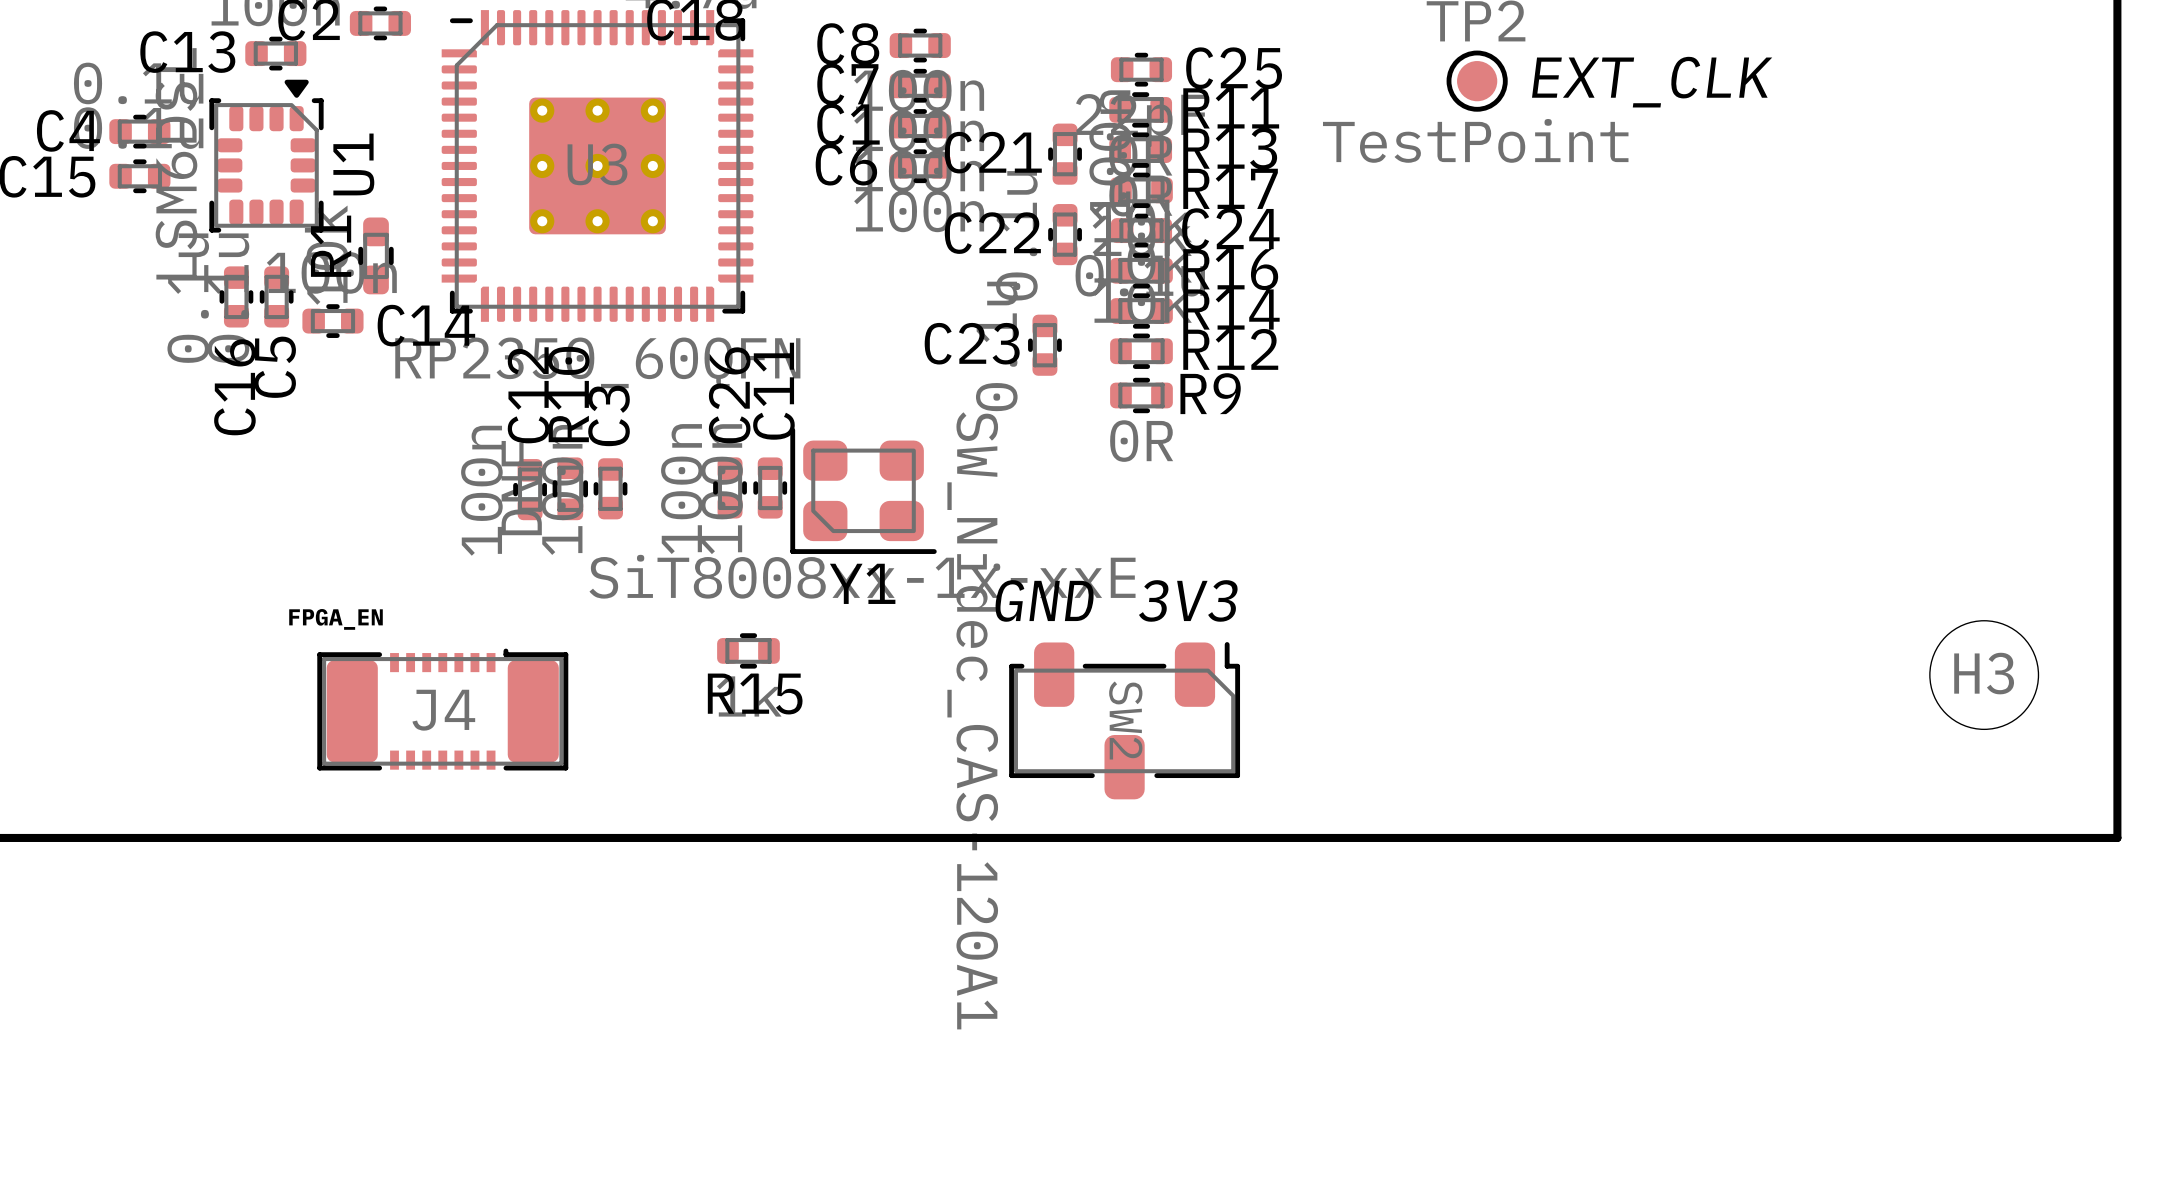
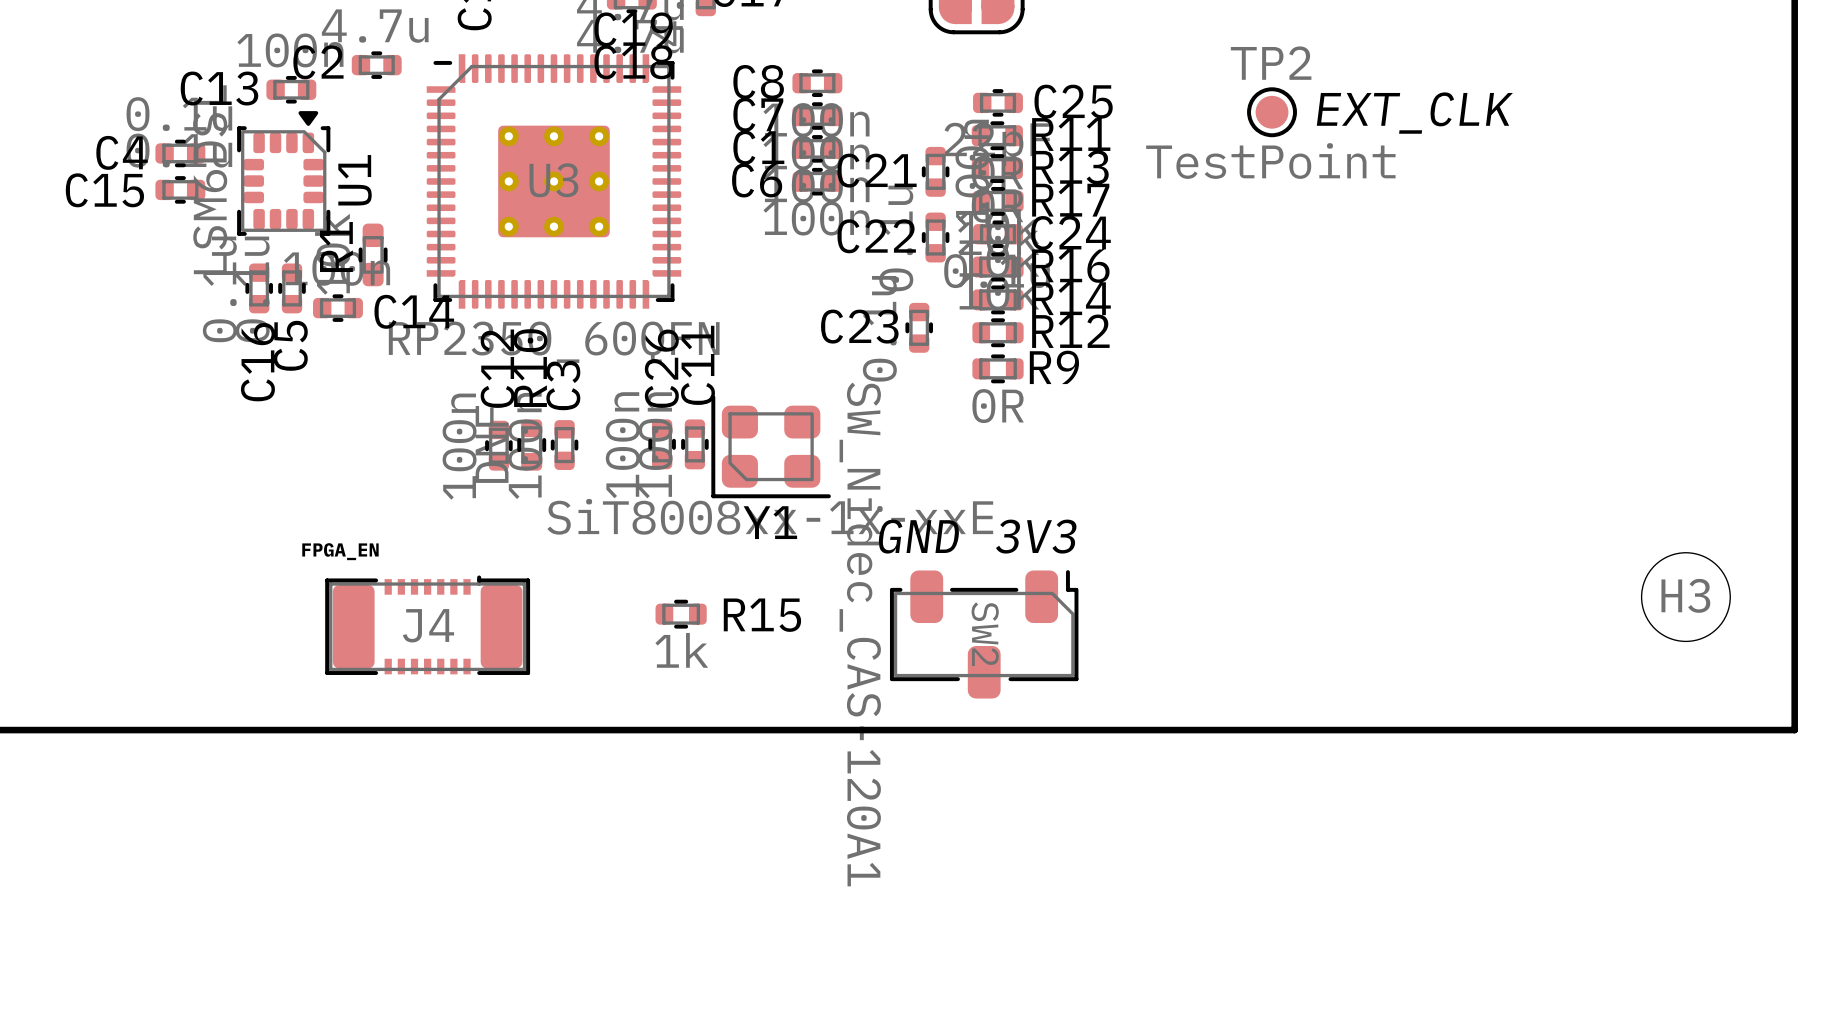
R15 position: (748, 650) -> (681, 614)
R15 name position: R15 (755, 694) -> R15 (762, 615)

